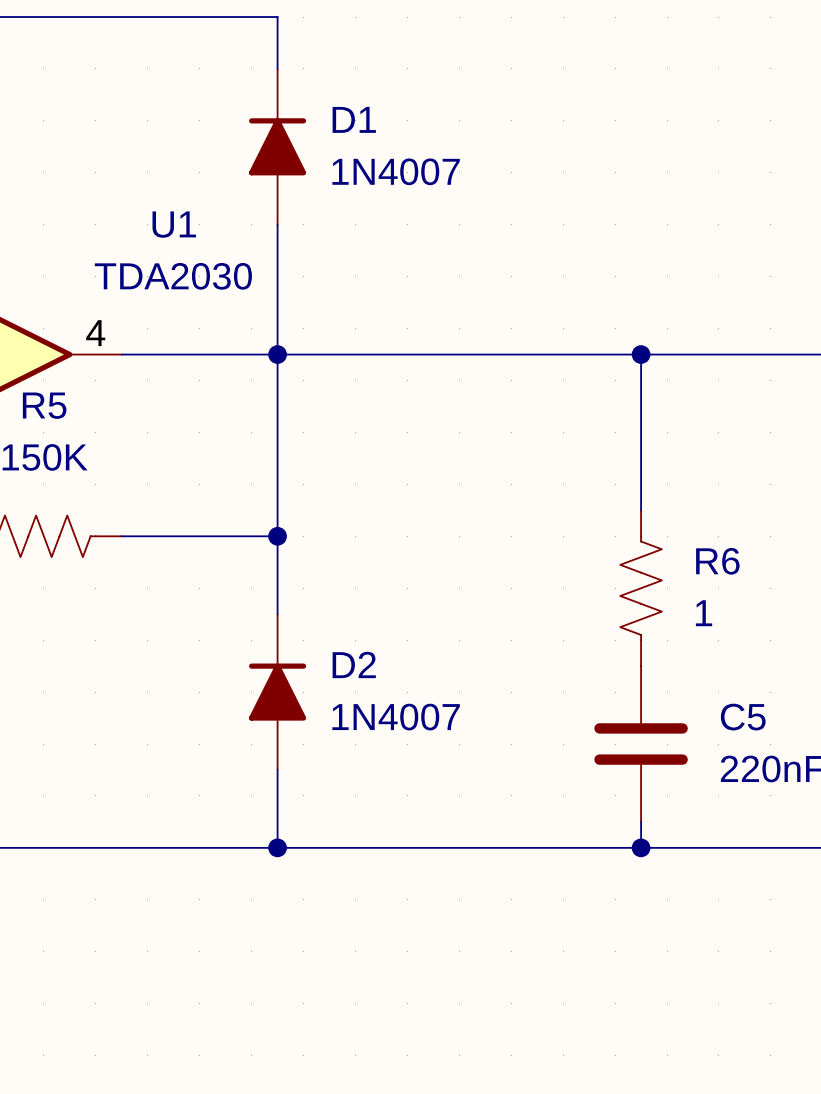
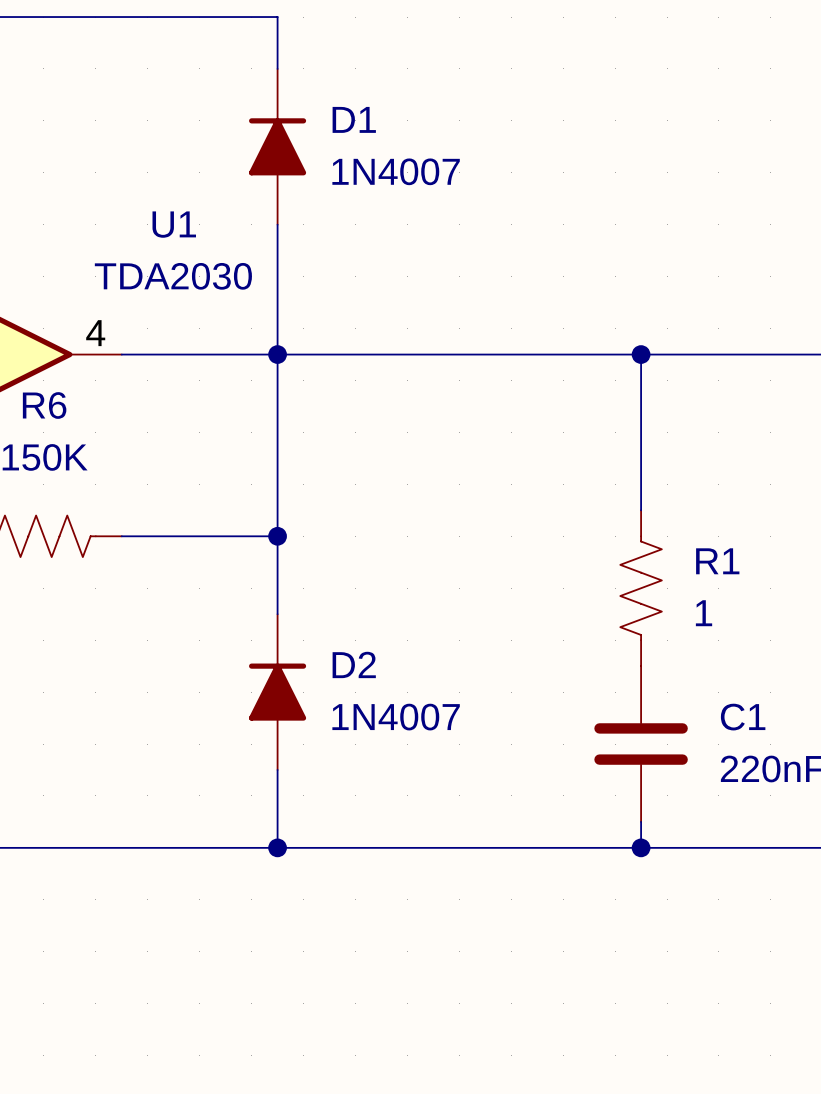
R5 name: R5 (44, 405) -> R6 (44, 405)
R6 name: R6 (717, 561) -> R1 (717, 561)
C5 name: C5 (743, 717) -> C1 (743, 717)

